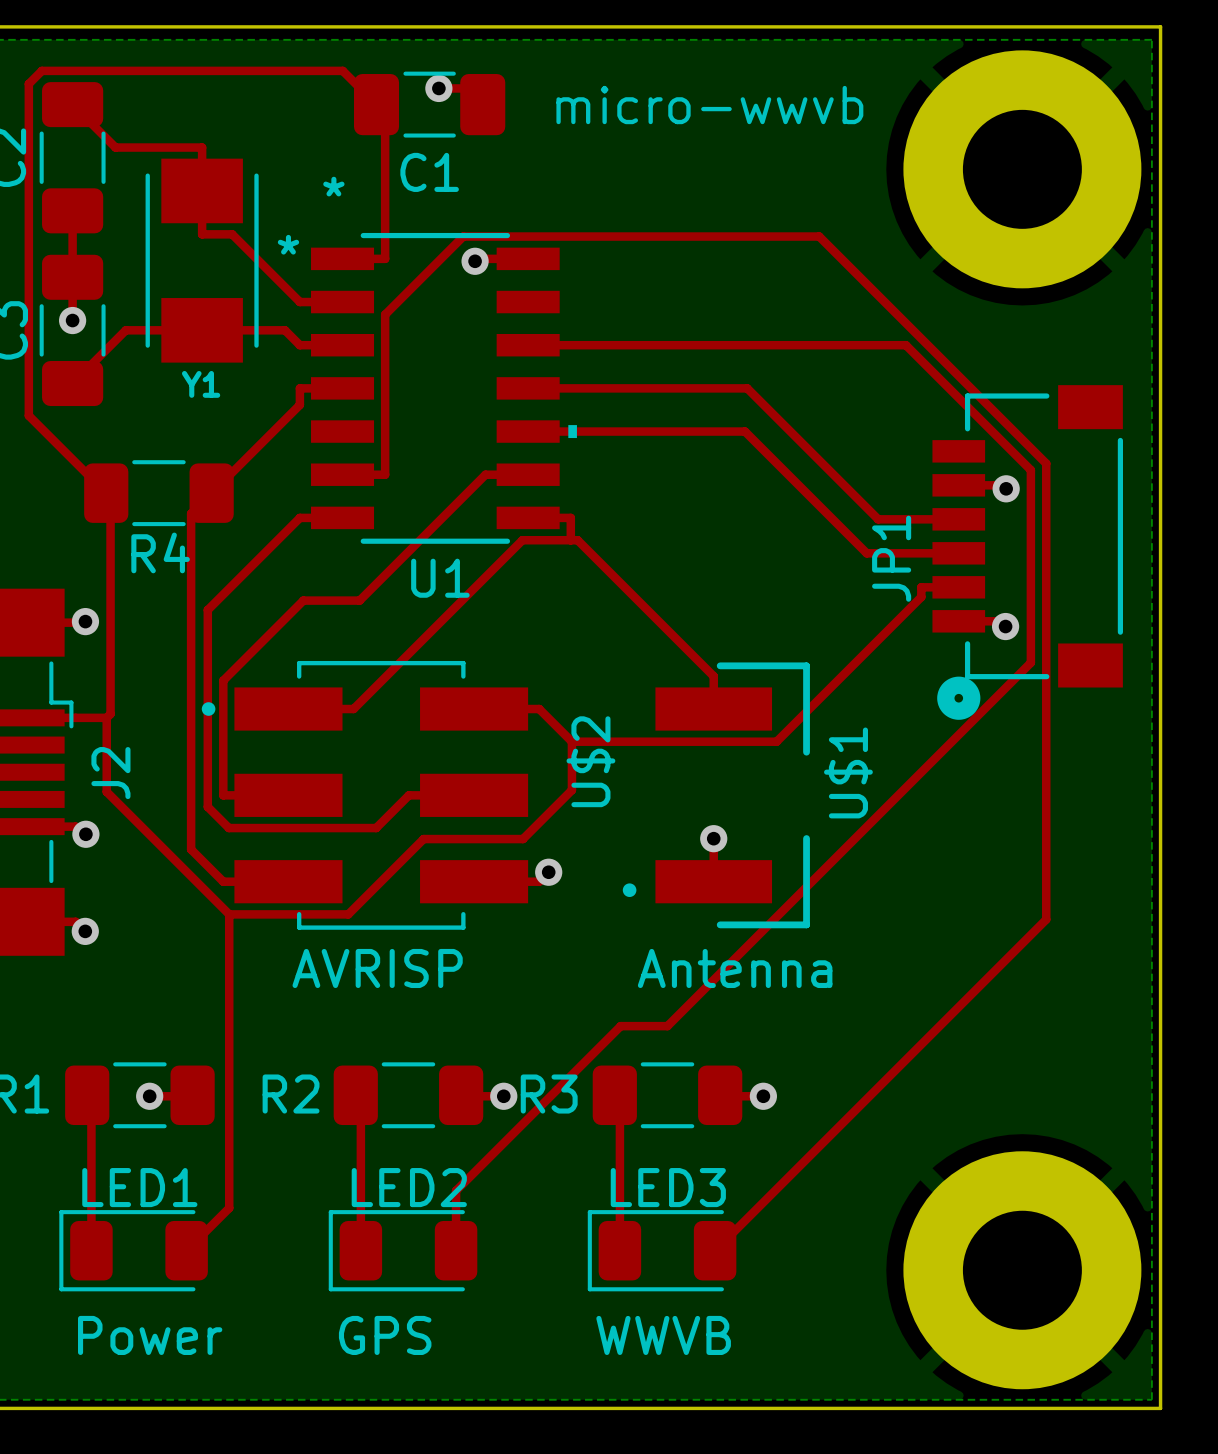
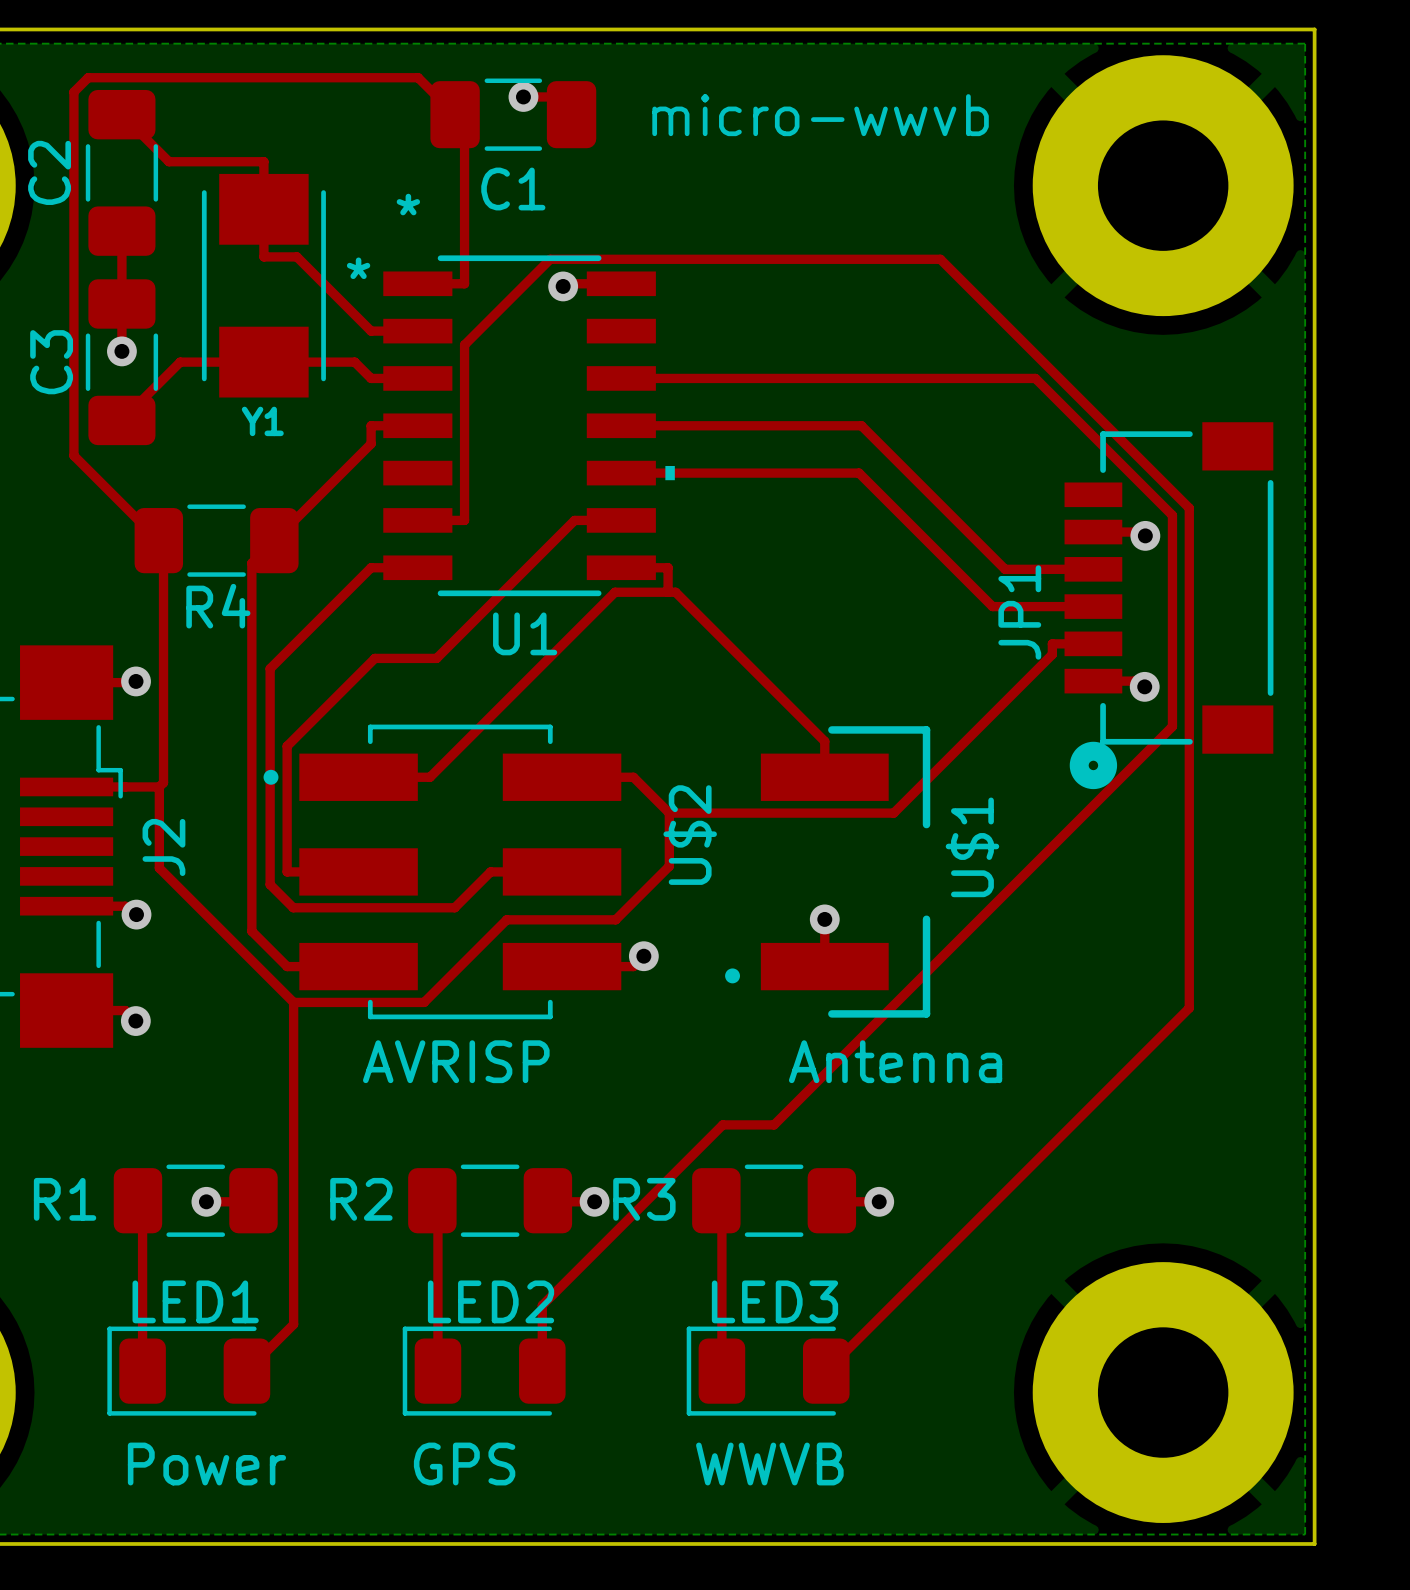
text position: Antenna (735, 968) -> Antenna (895, 1061)

